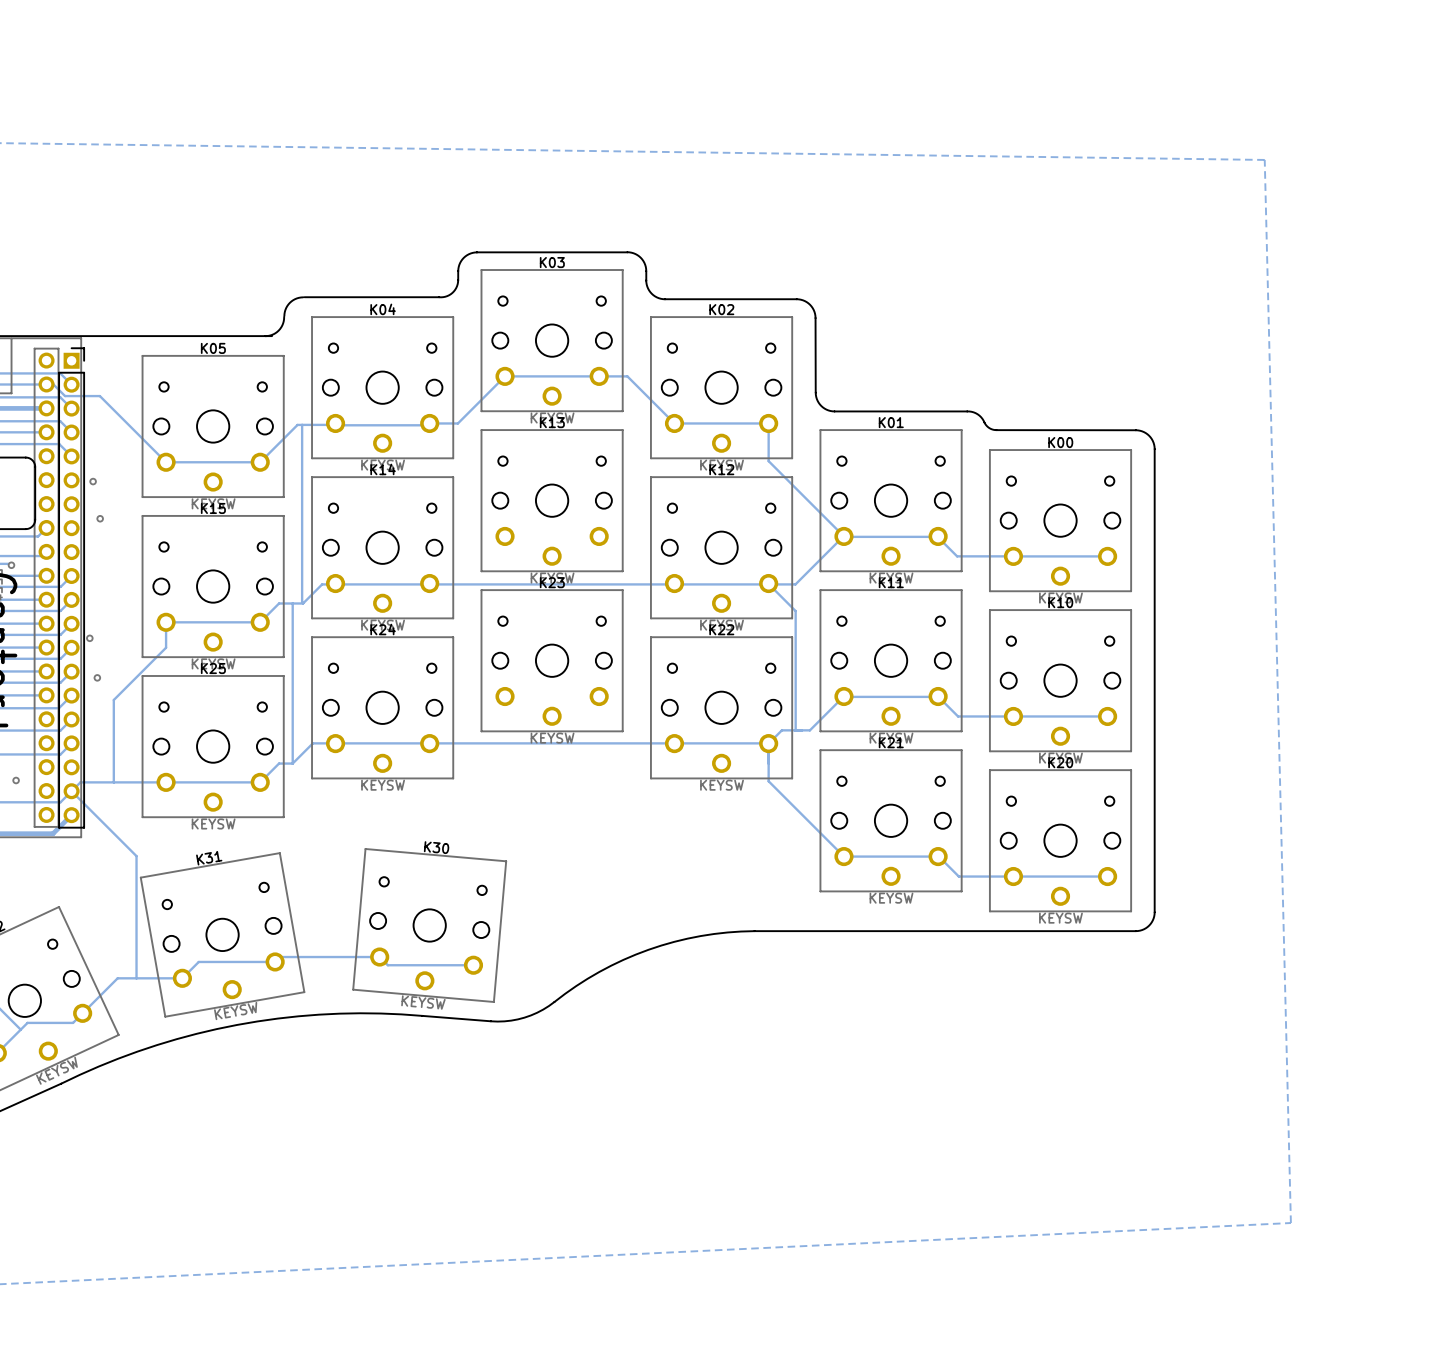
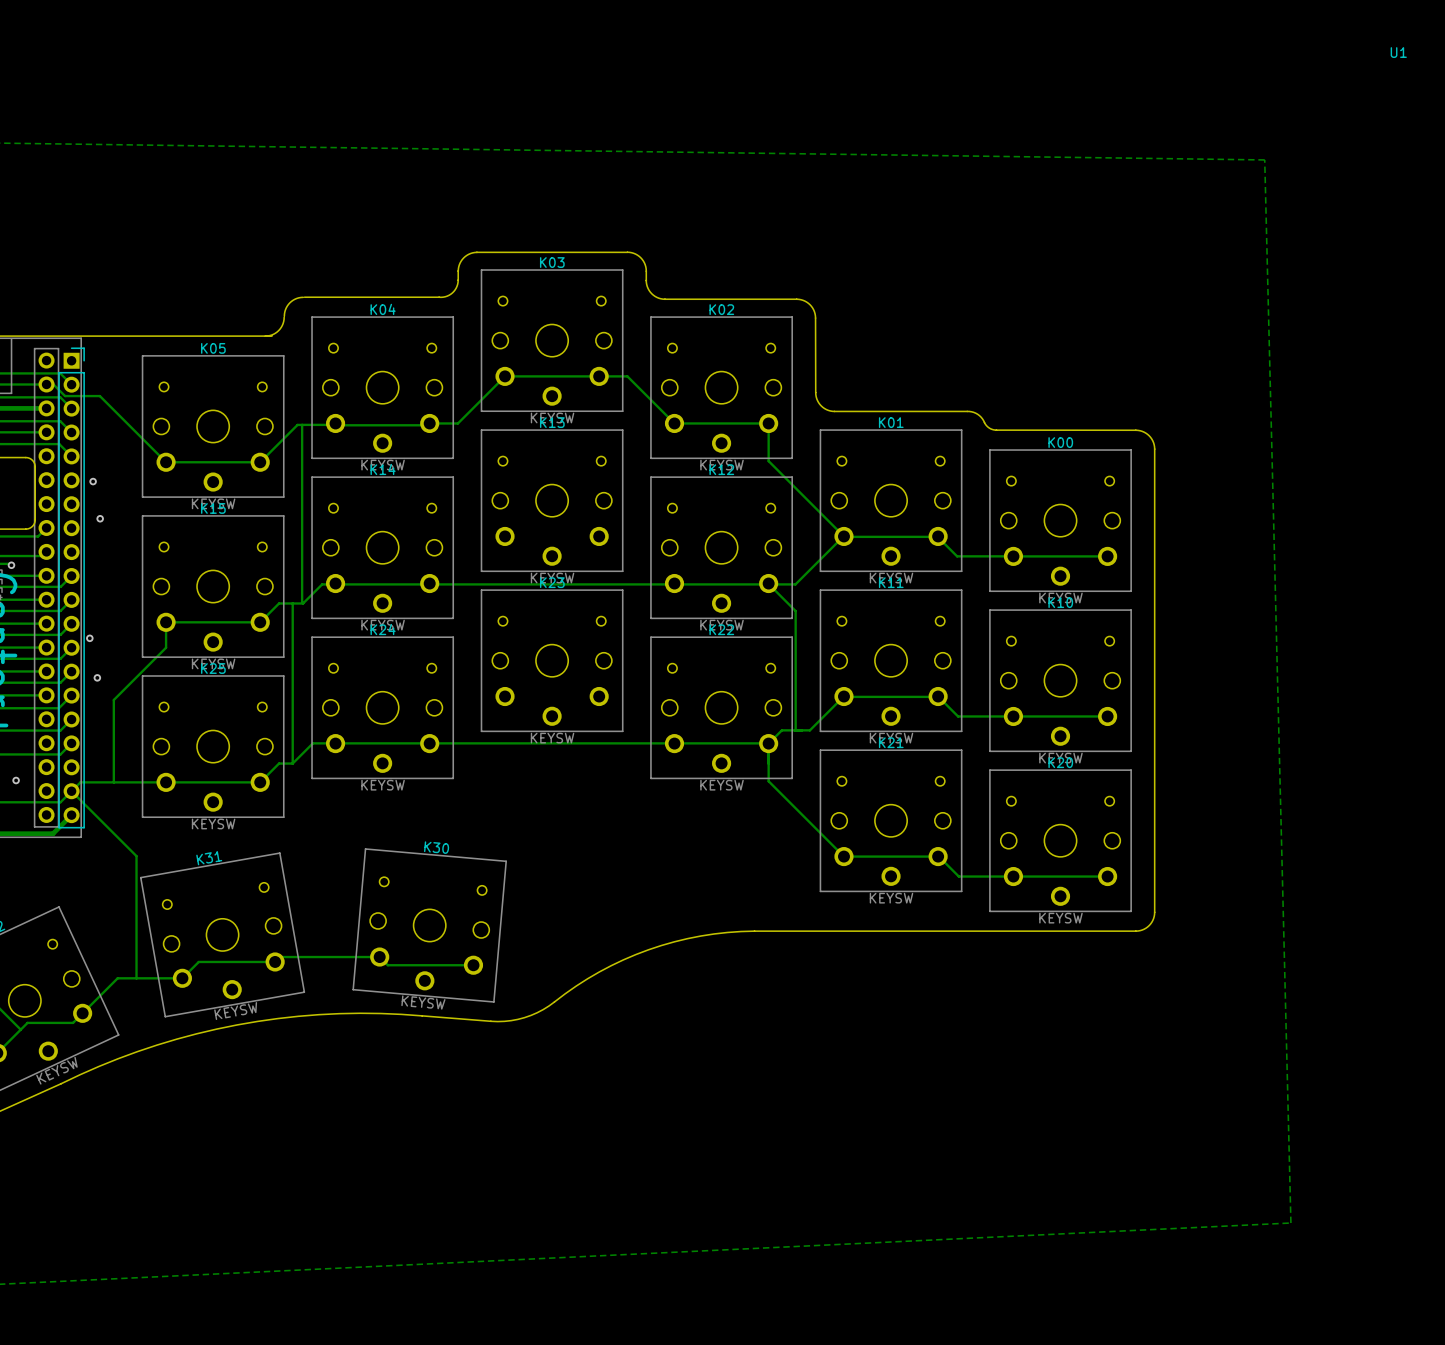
text: none -> U1 (1398, 52)

